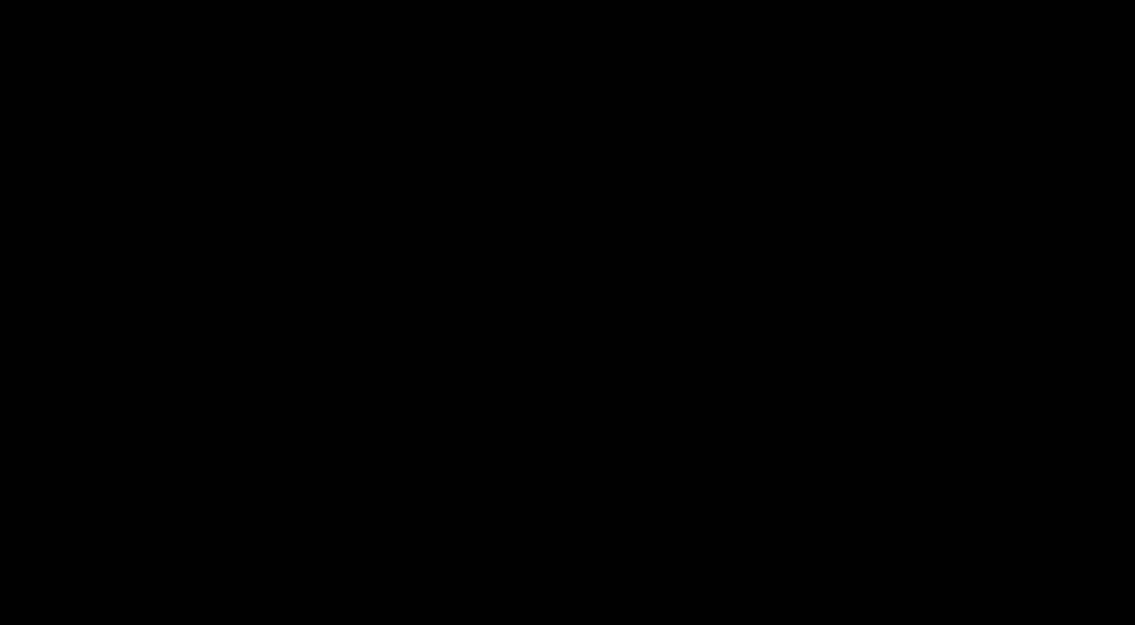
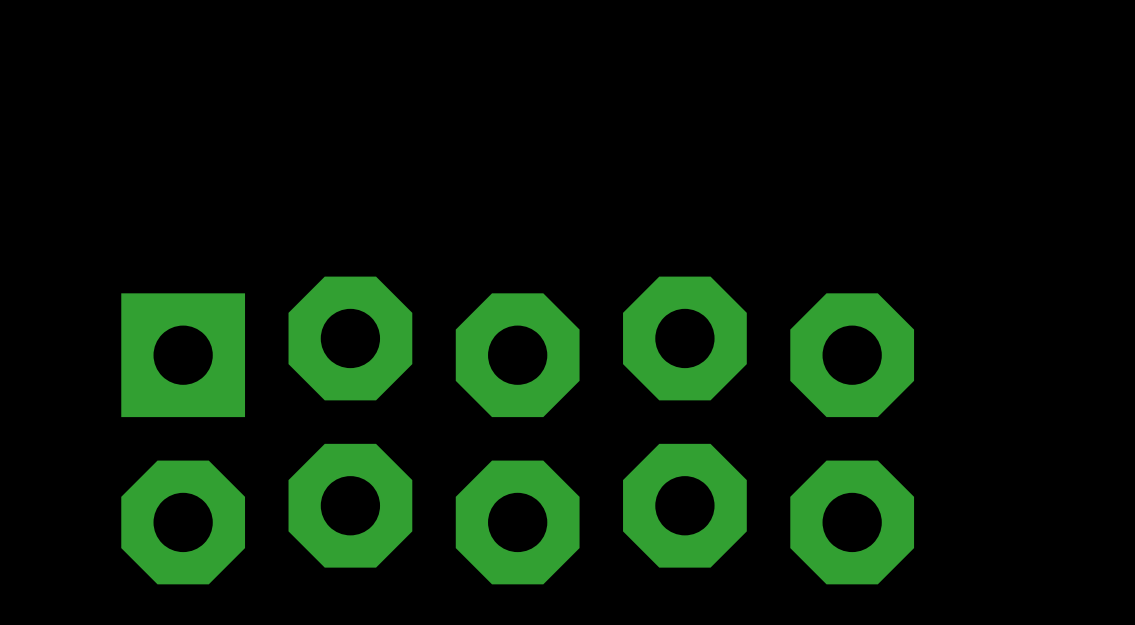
part: none -> (517, 430)

